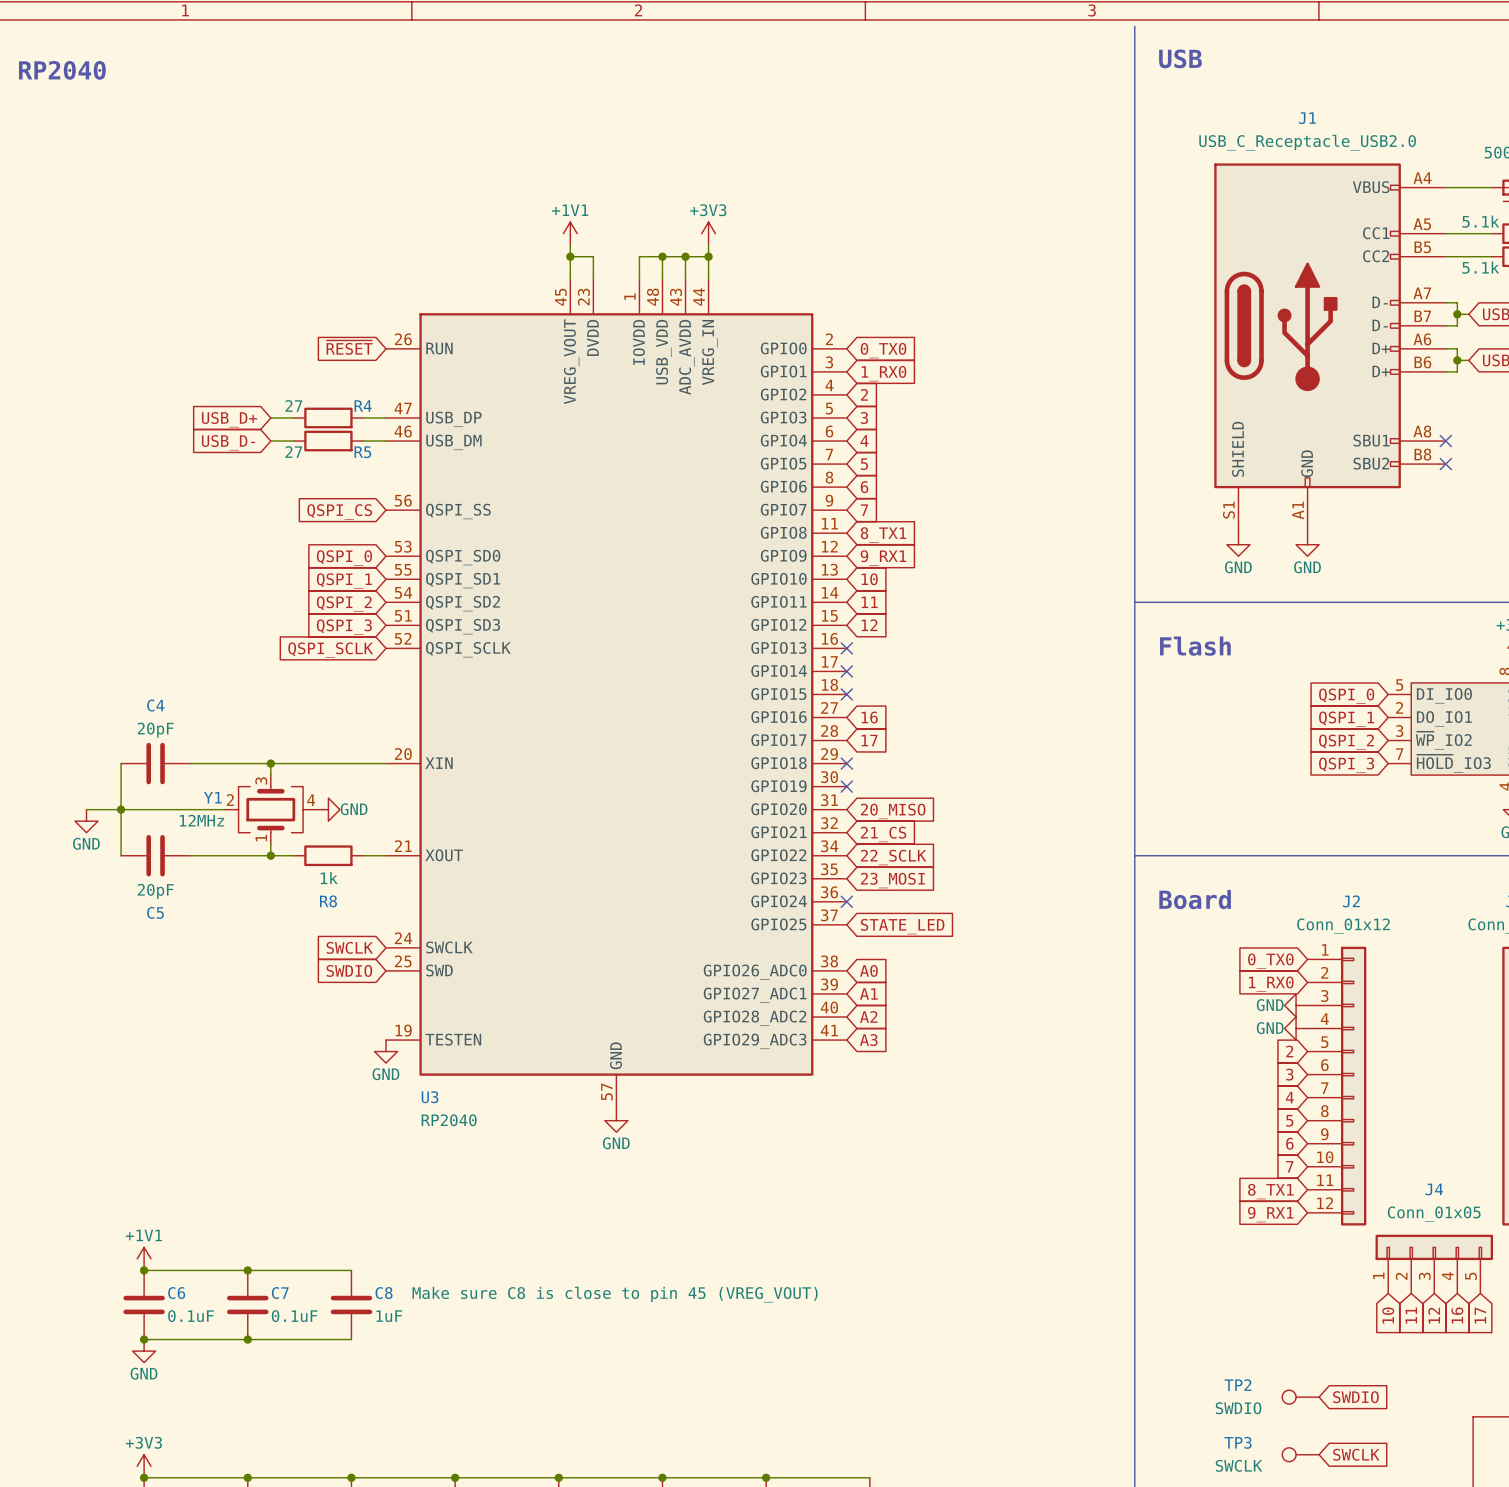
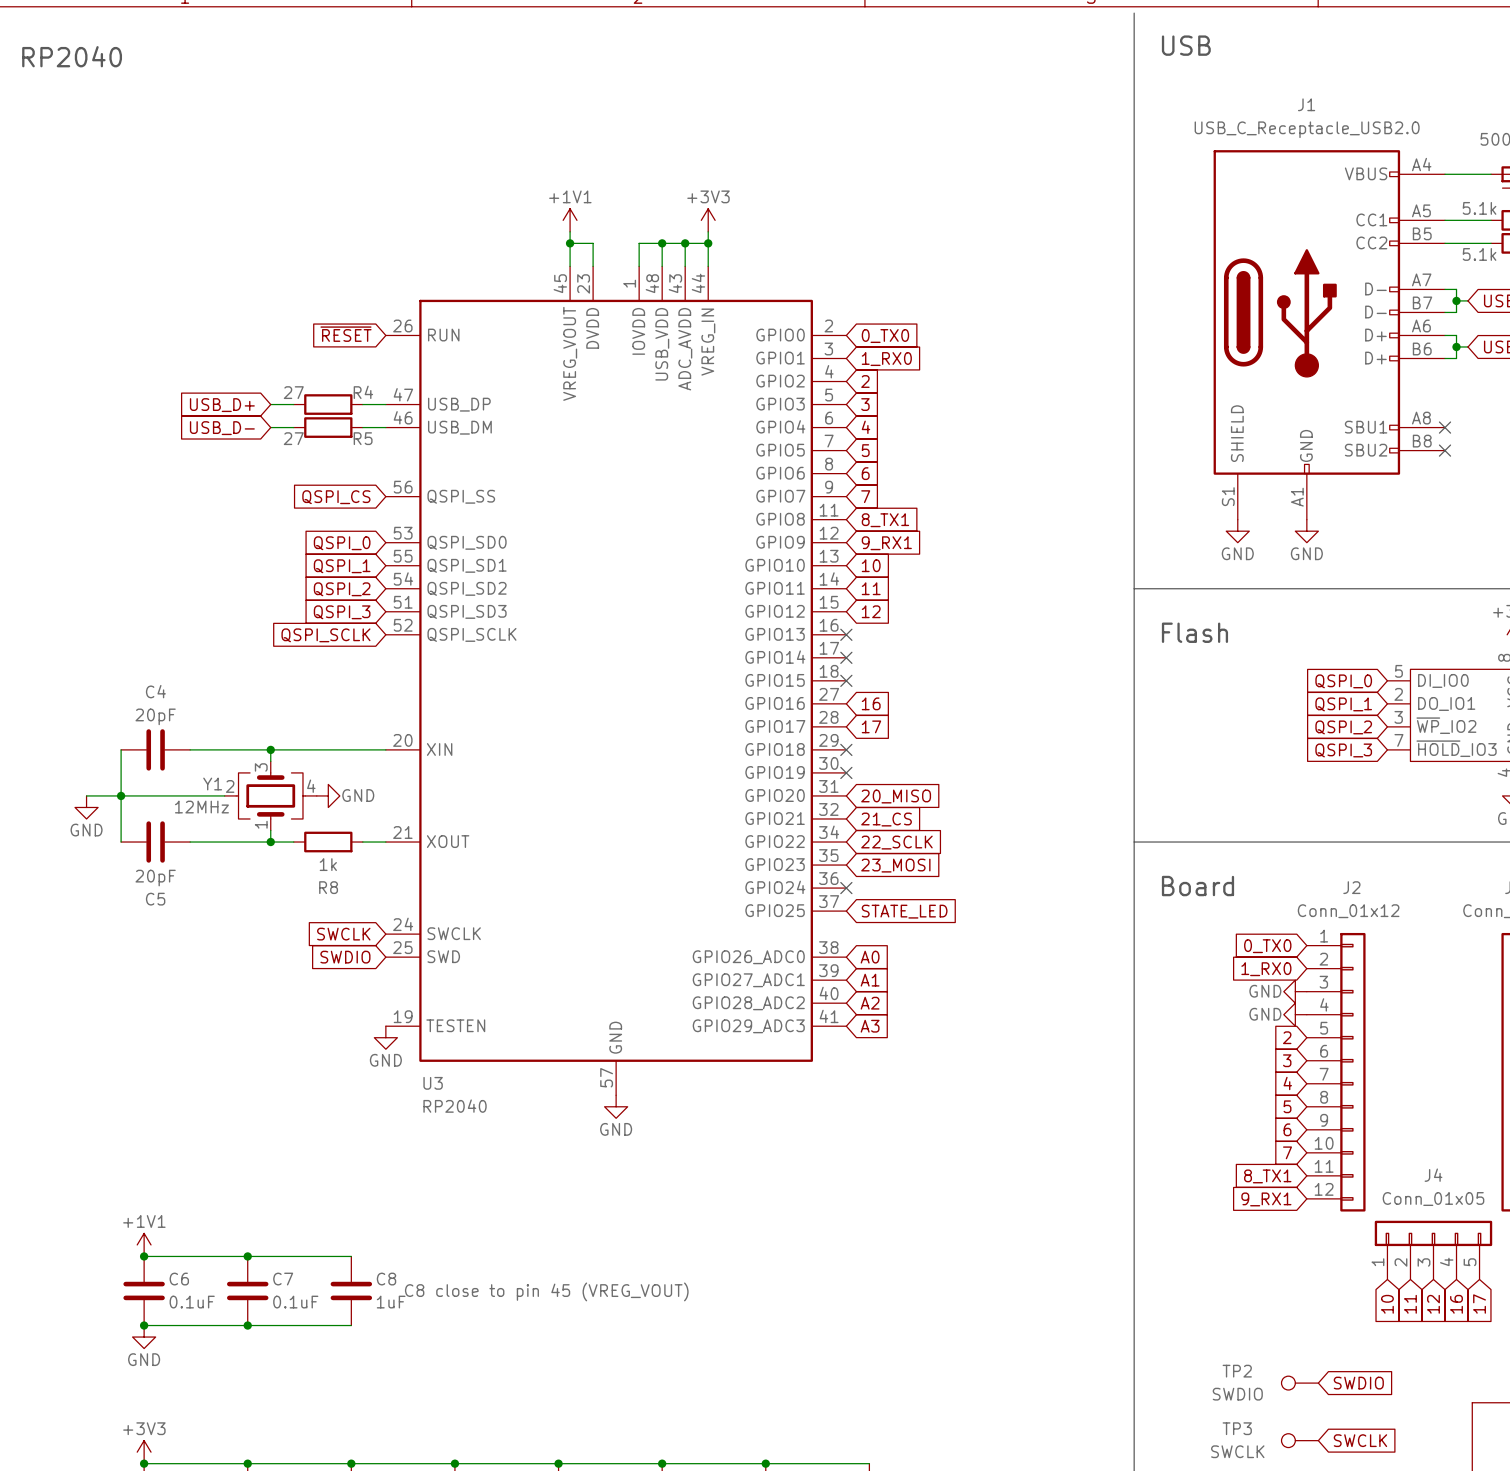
C8 text: Make sure C8 is close to pin 45 (VREG_VOUT) (615, 1294) -> C8 close to pin 45 (VREG_VOUT) (546, 1291)

